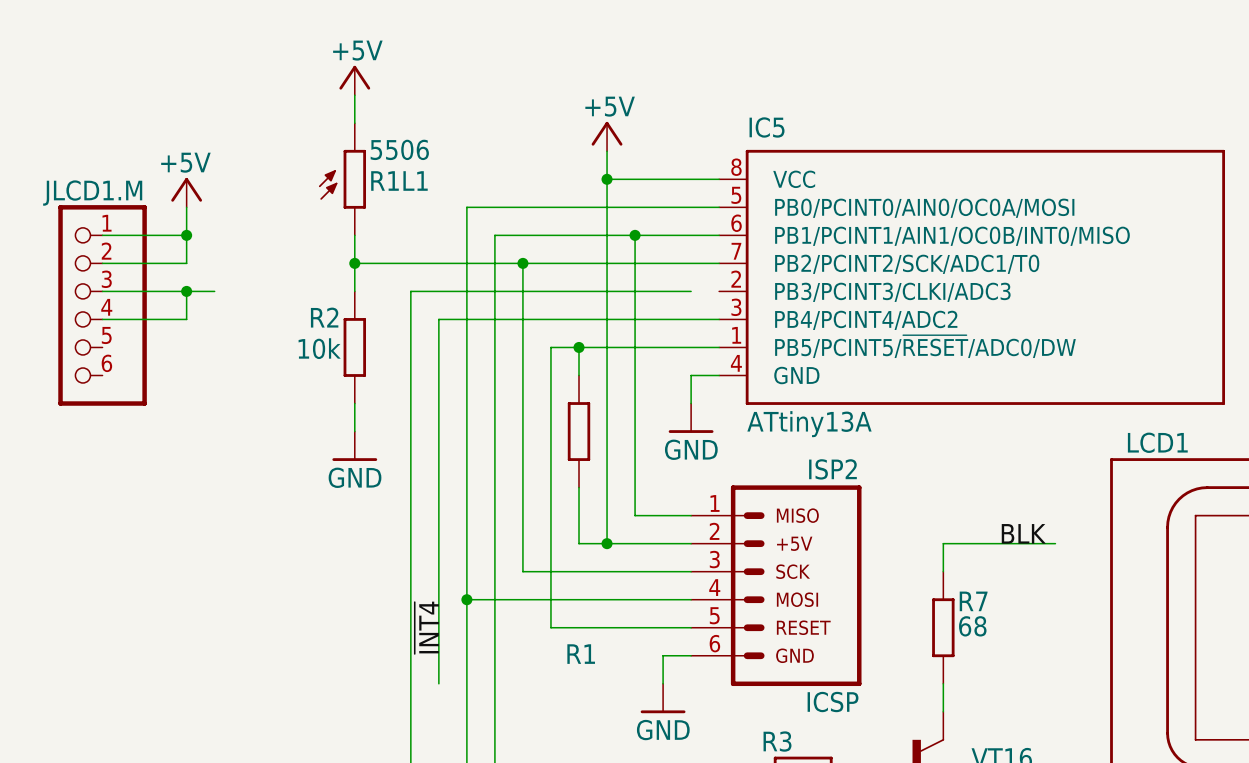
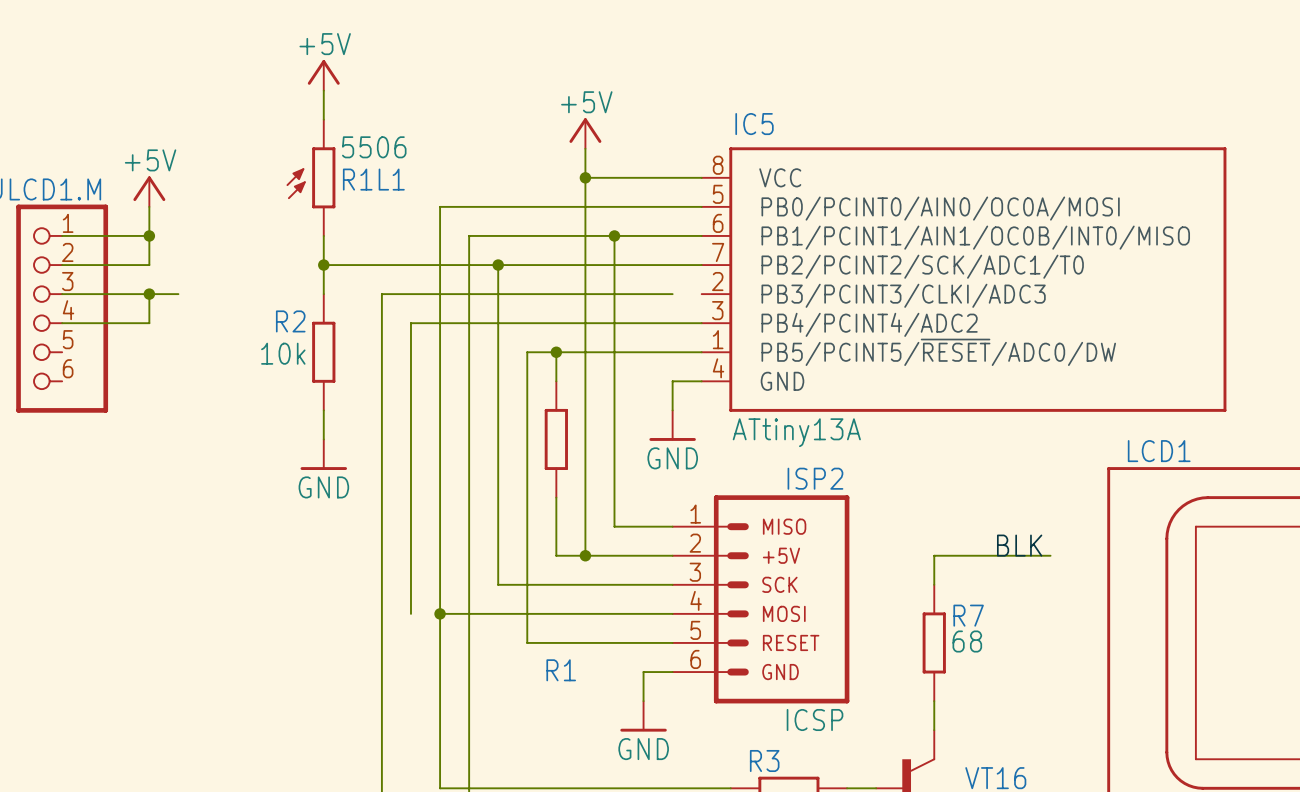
wire: (438, 599) (438, 683) -> none
label: ~{INT4} (426, 627) -> none

